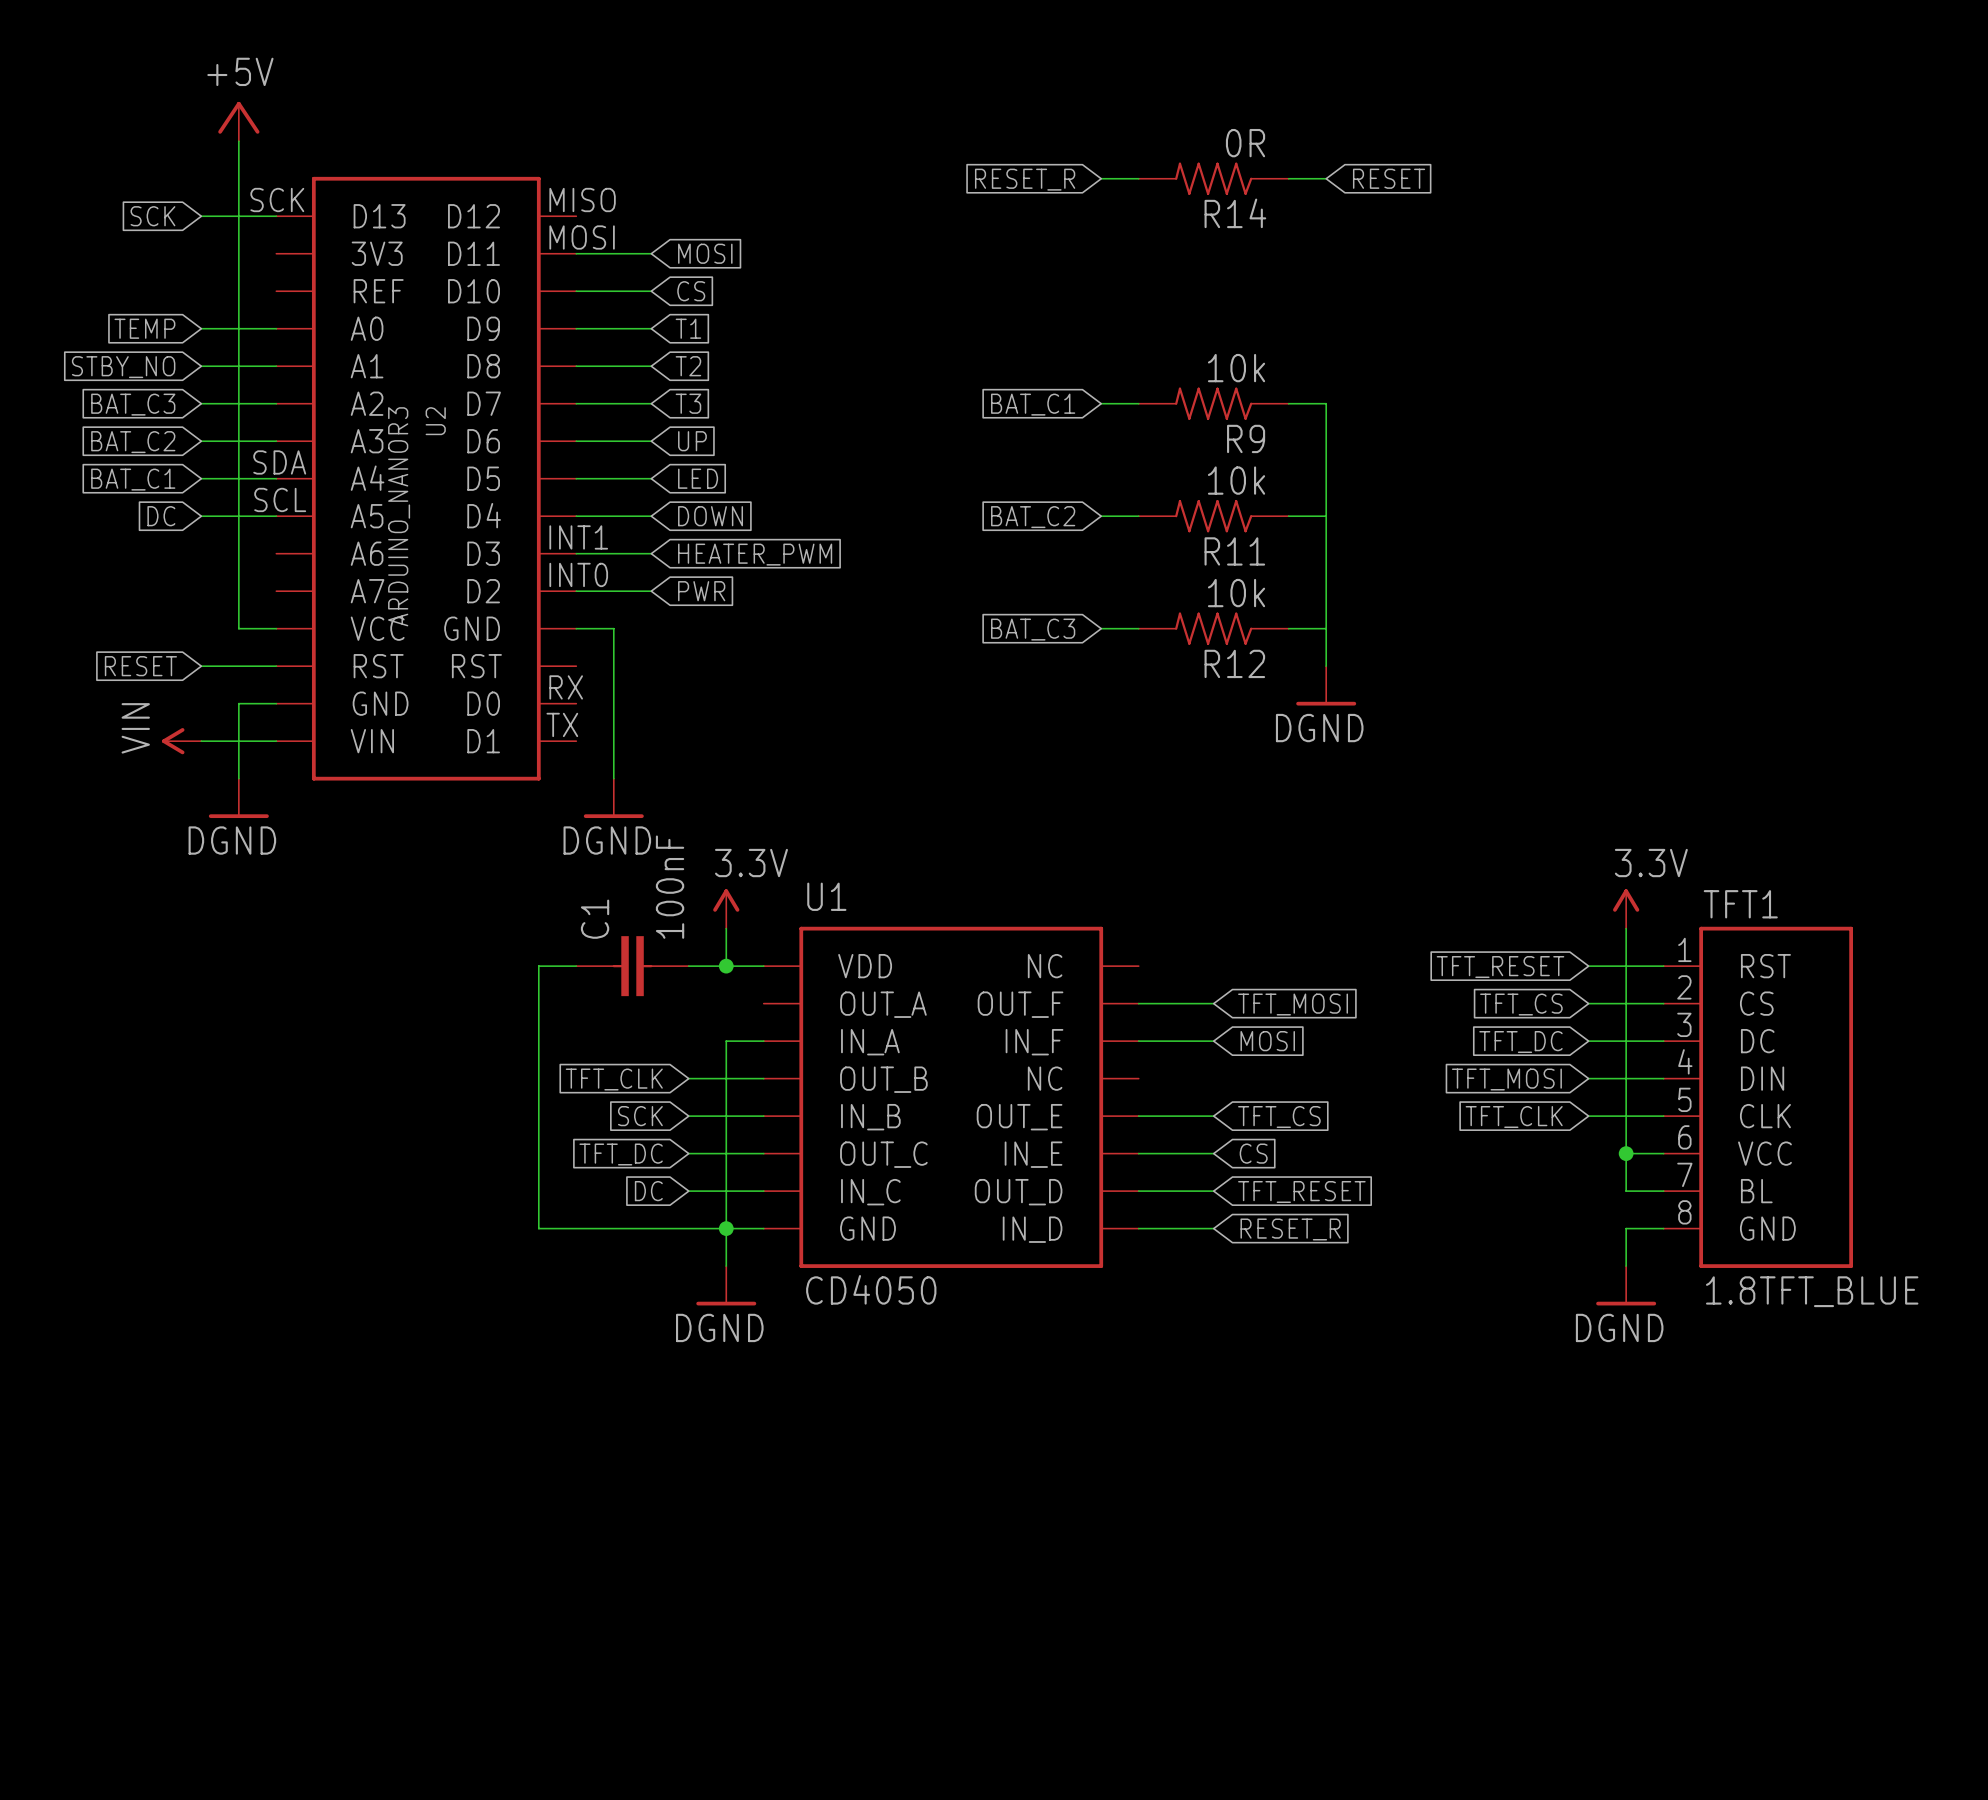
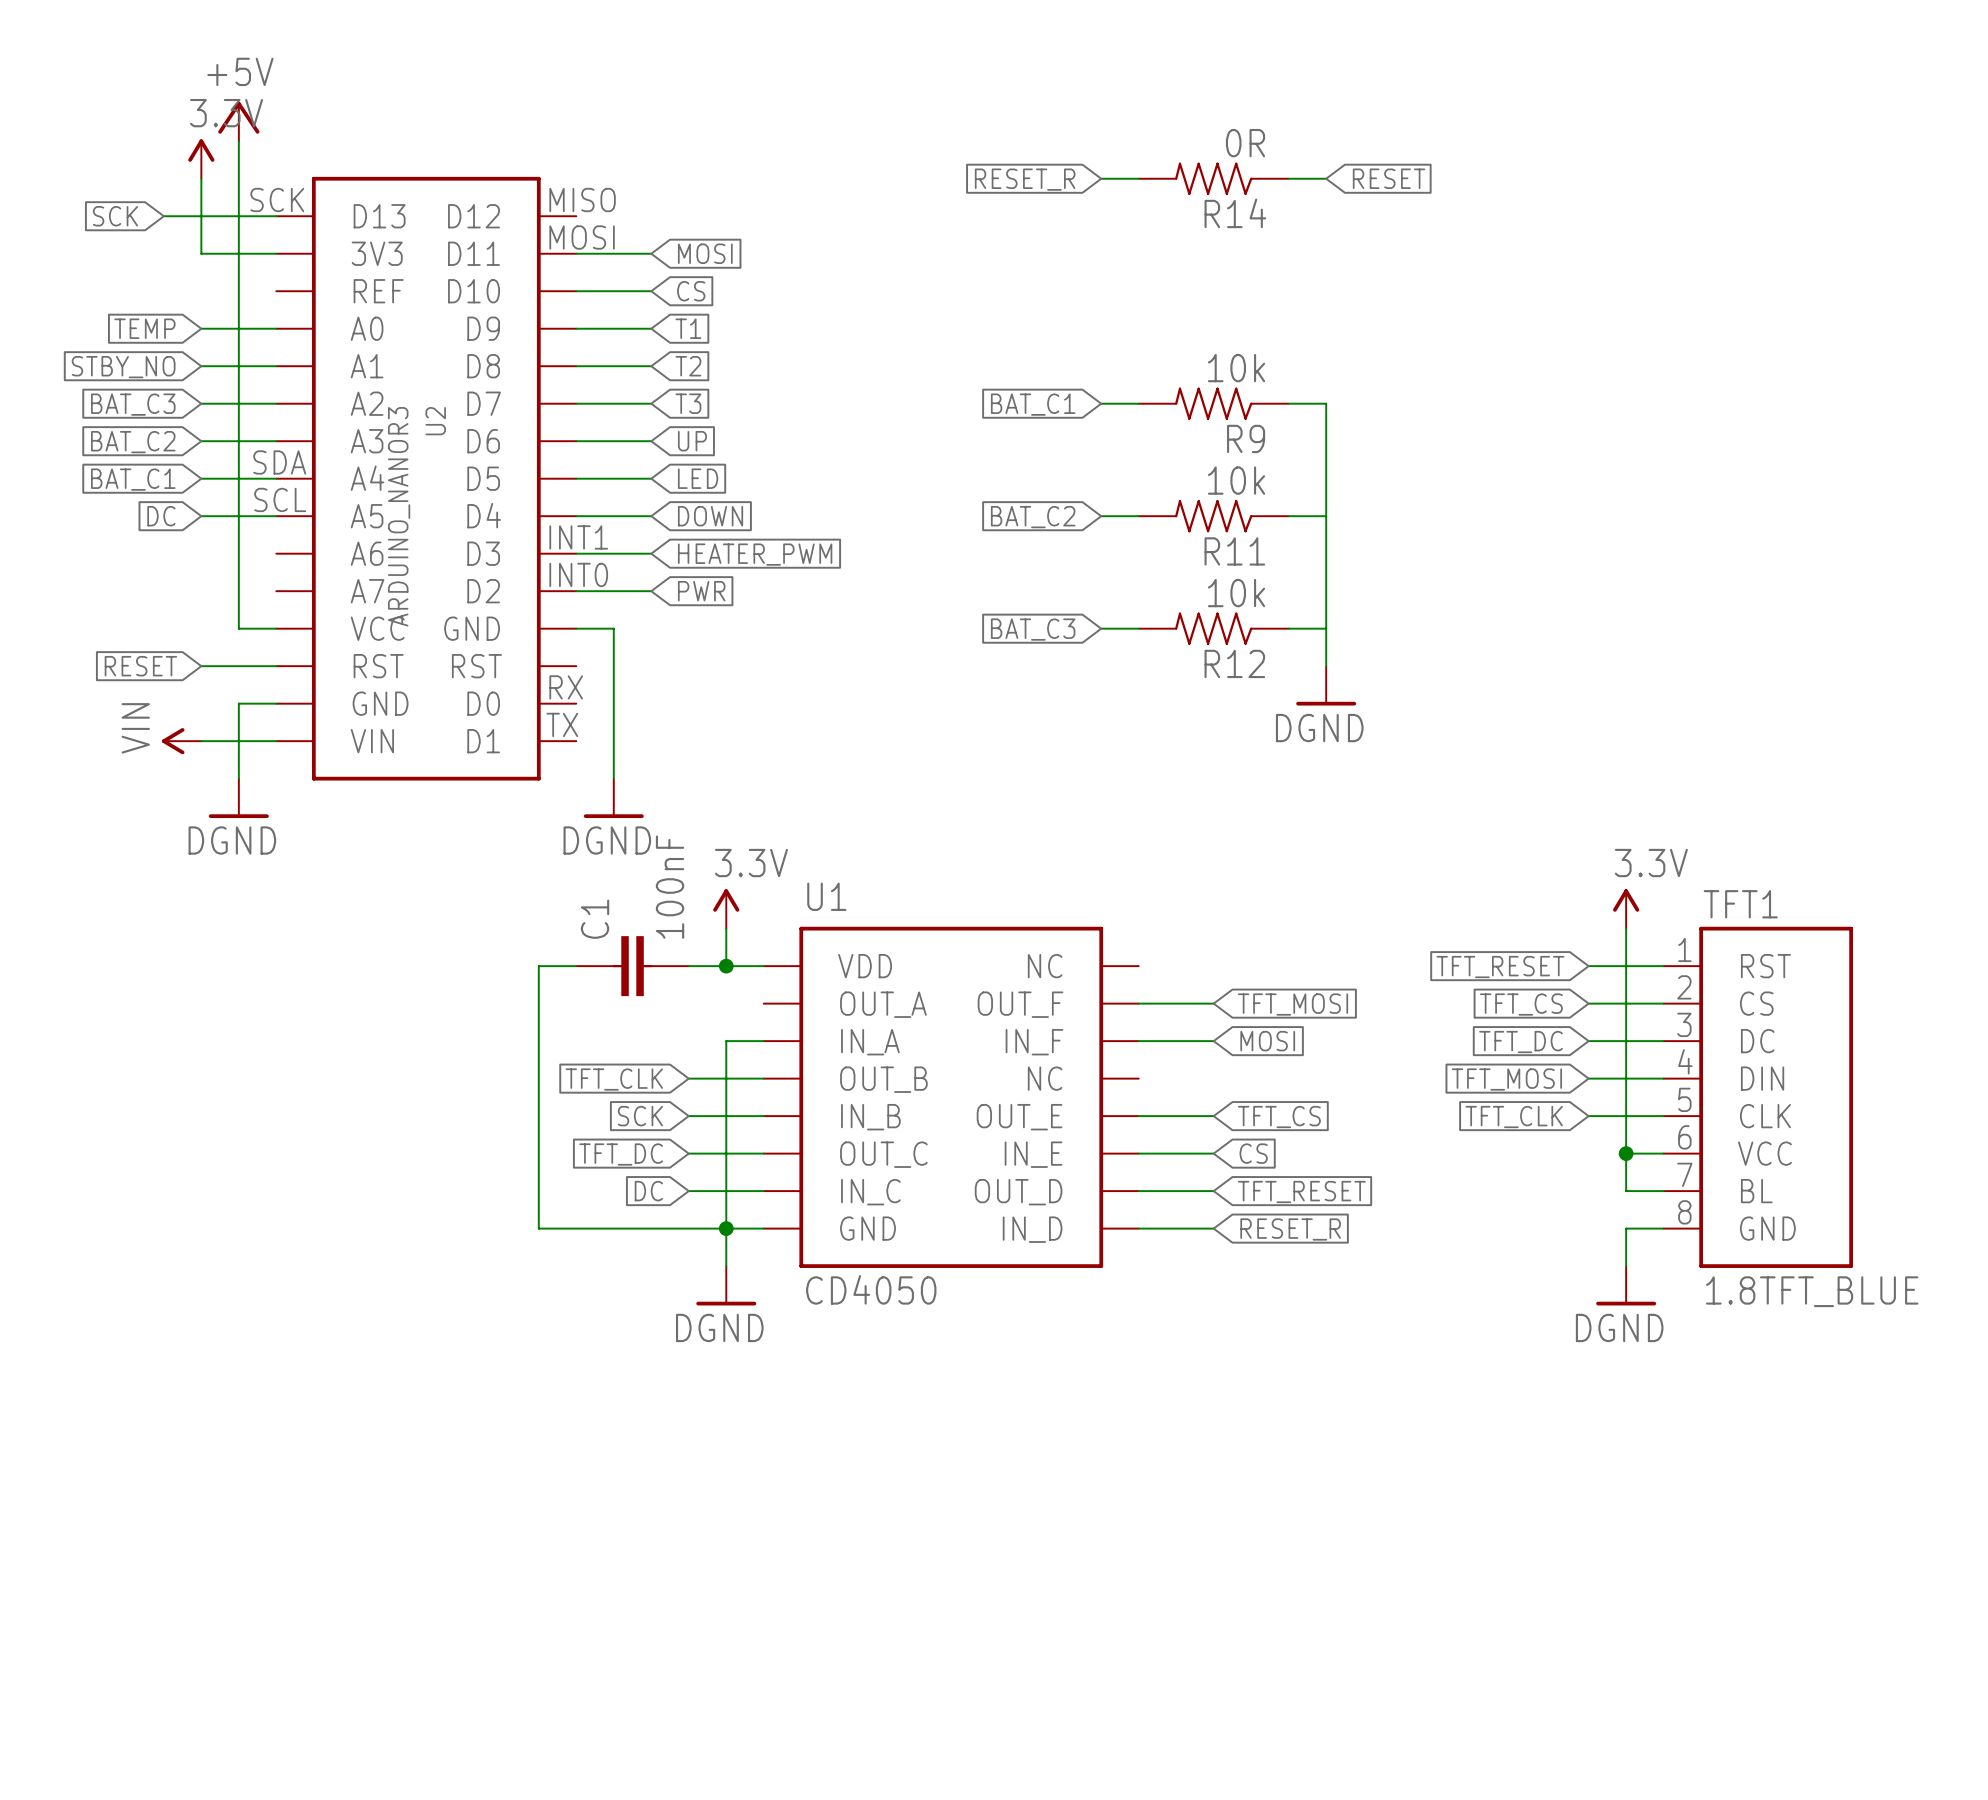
power symbol: none -> 3.3V (201, 159)
wire: none -> (201, 178) (201, 253) (276, 253)
global label position: SCK (152, 216) -> SCK (115, 216)
wire: none -> (163, 216) (201, 216)

